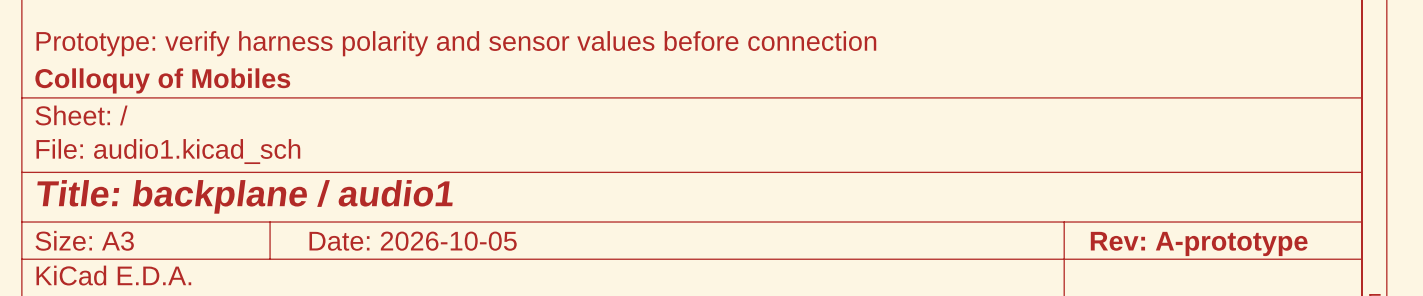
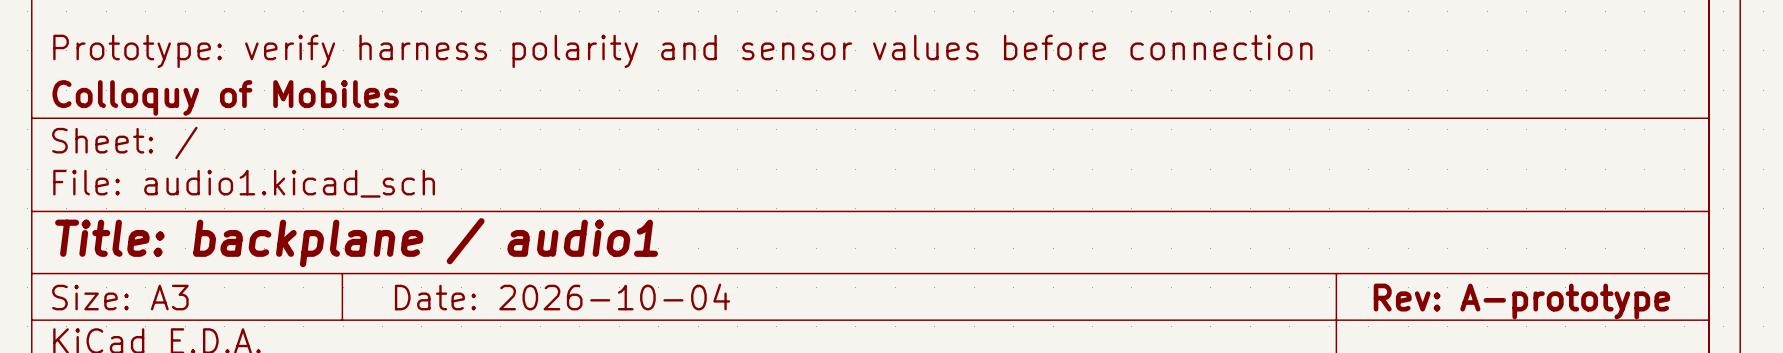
title block: Date: 2026-10-05 (413, 241) -> Date: 2026-10-04 (562, 296)

